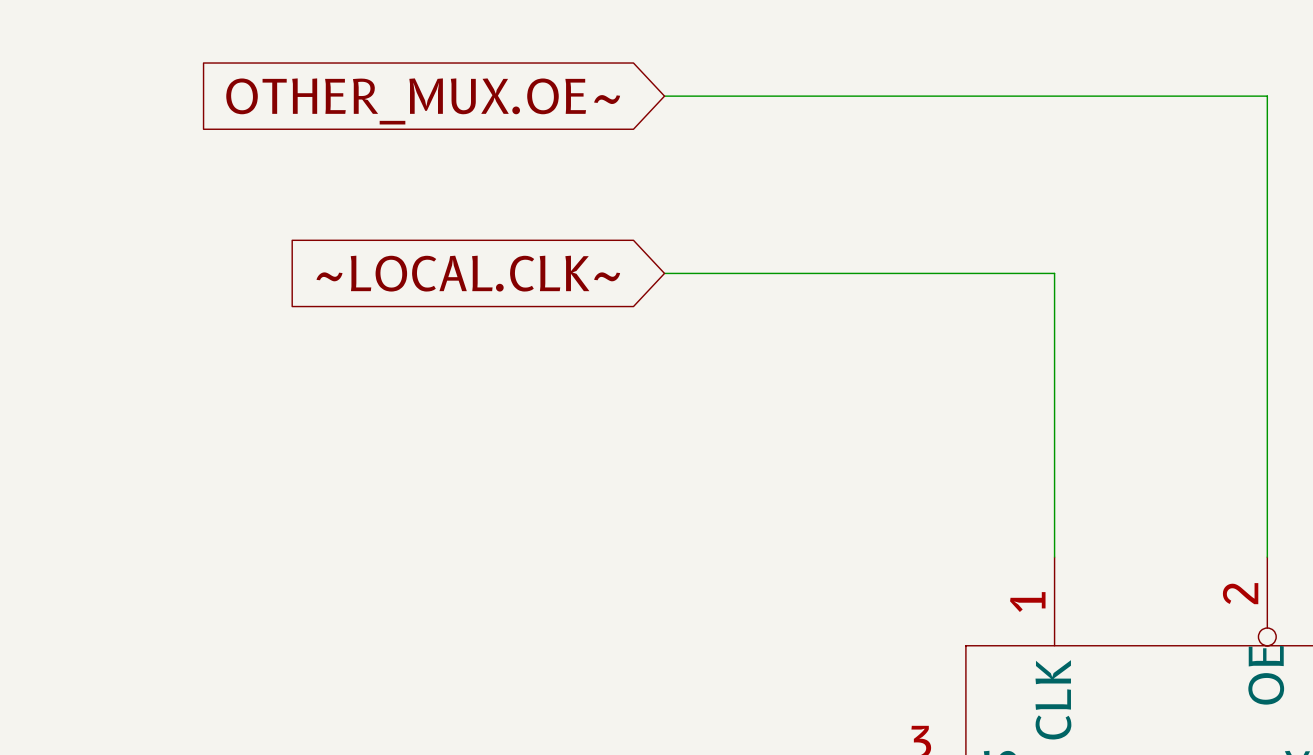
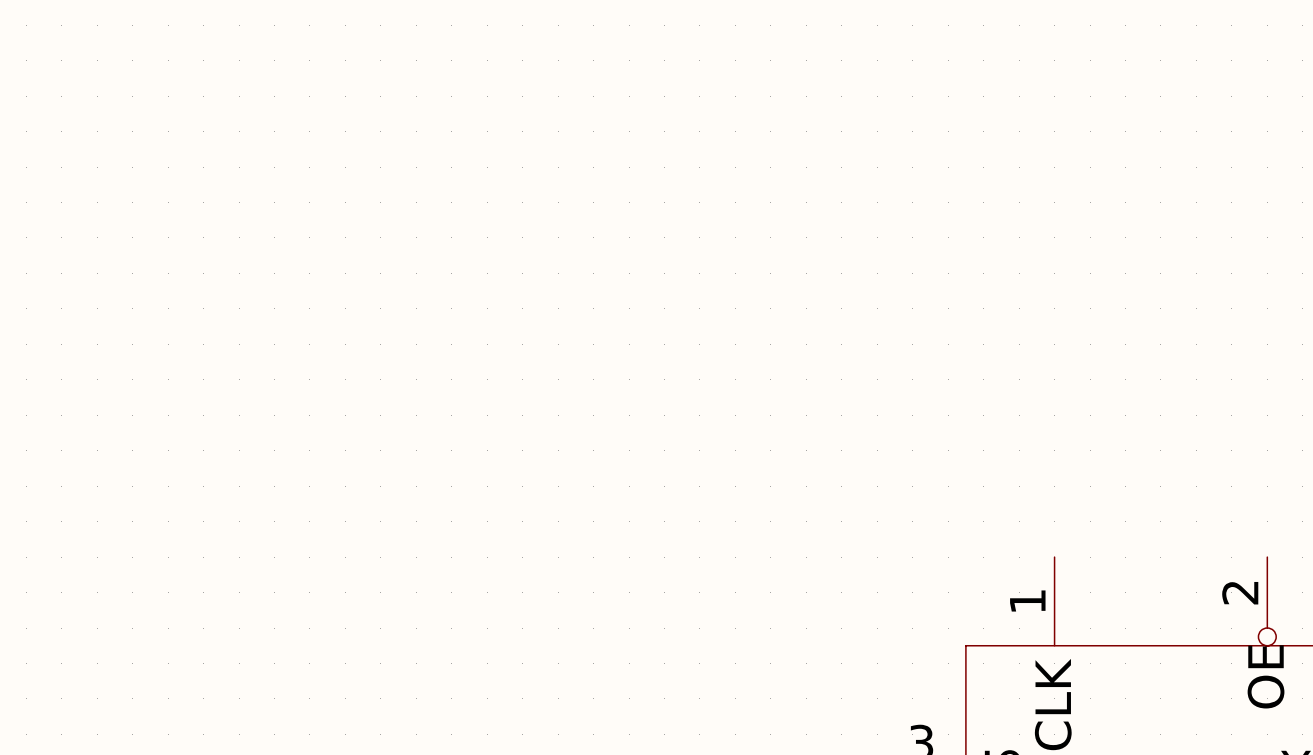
wire: (664, 96) (1267, 96) (1267, 557) -> none
global label: OTHER_MUX.OE~ (423, 101) -> none
global label: ~LOCAL.CLK~ (468, 273) -> none
wire: (664, 273) (1054, 273) (1054, 557) -> none

